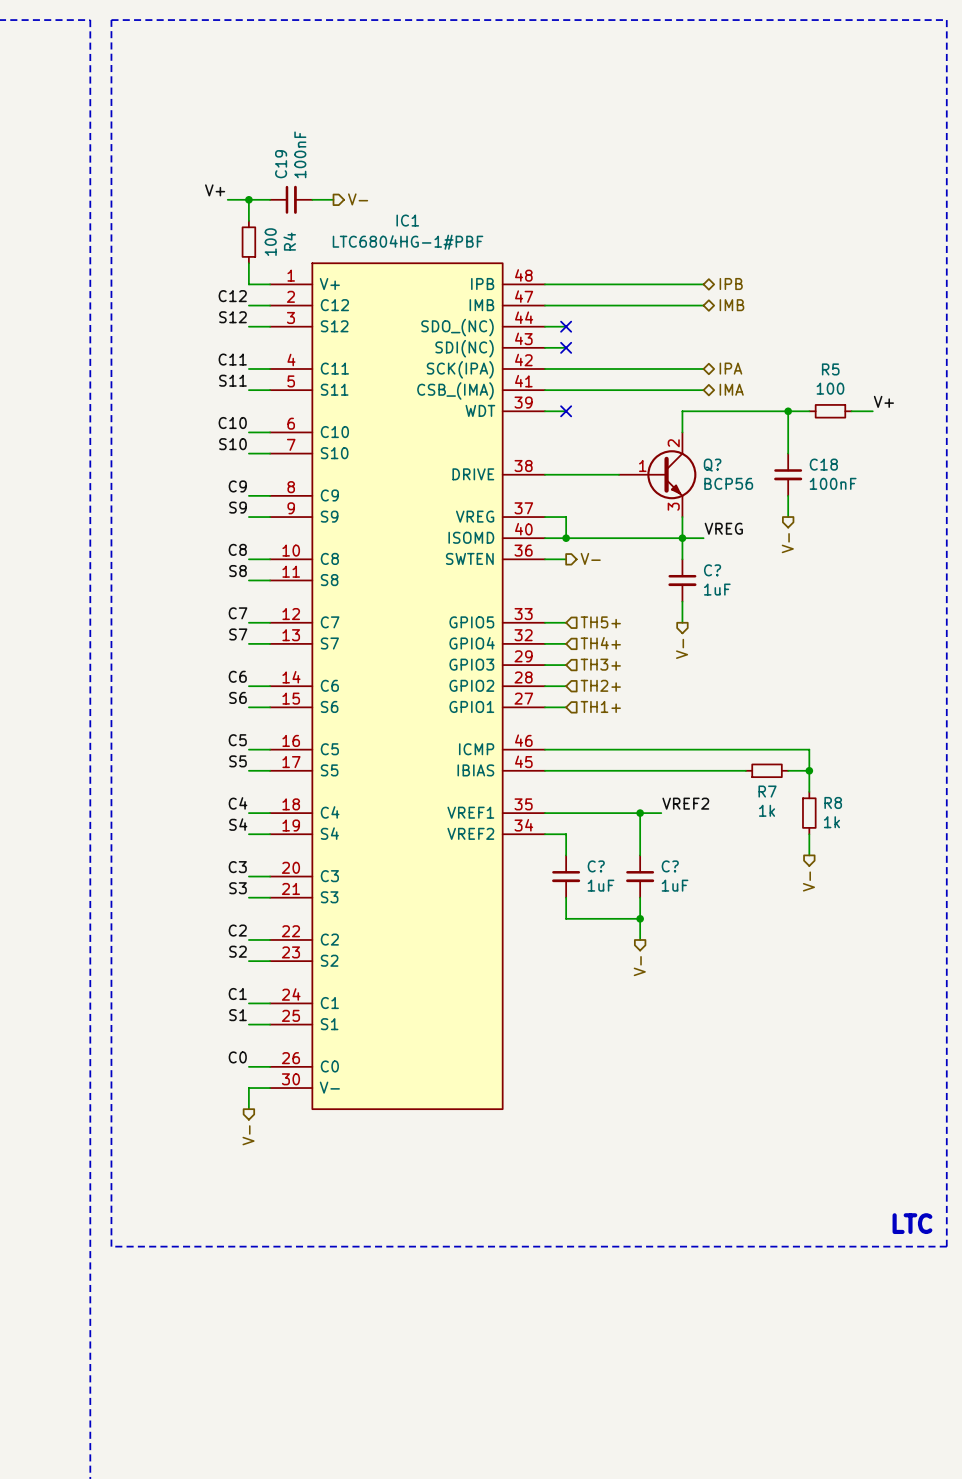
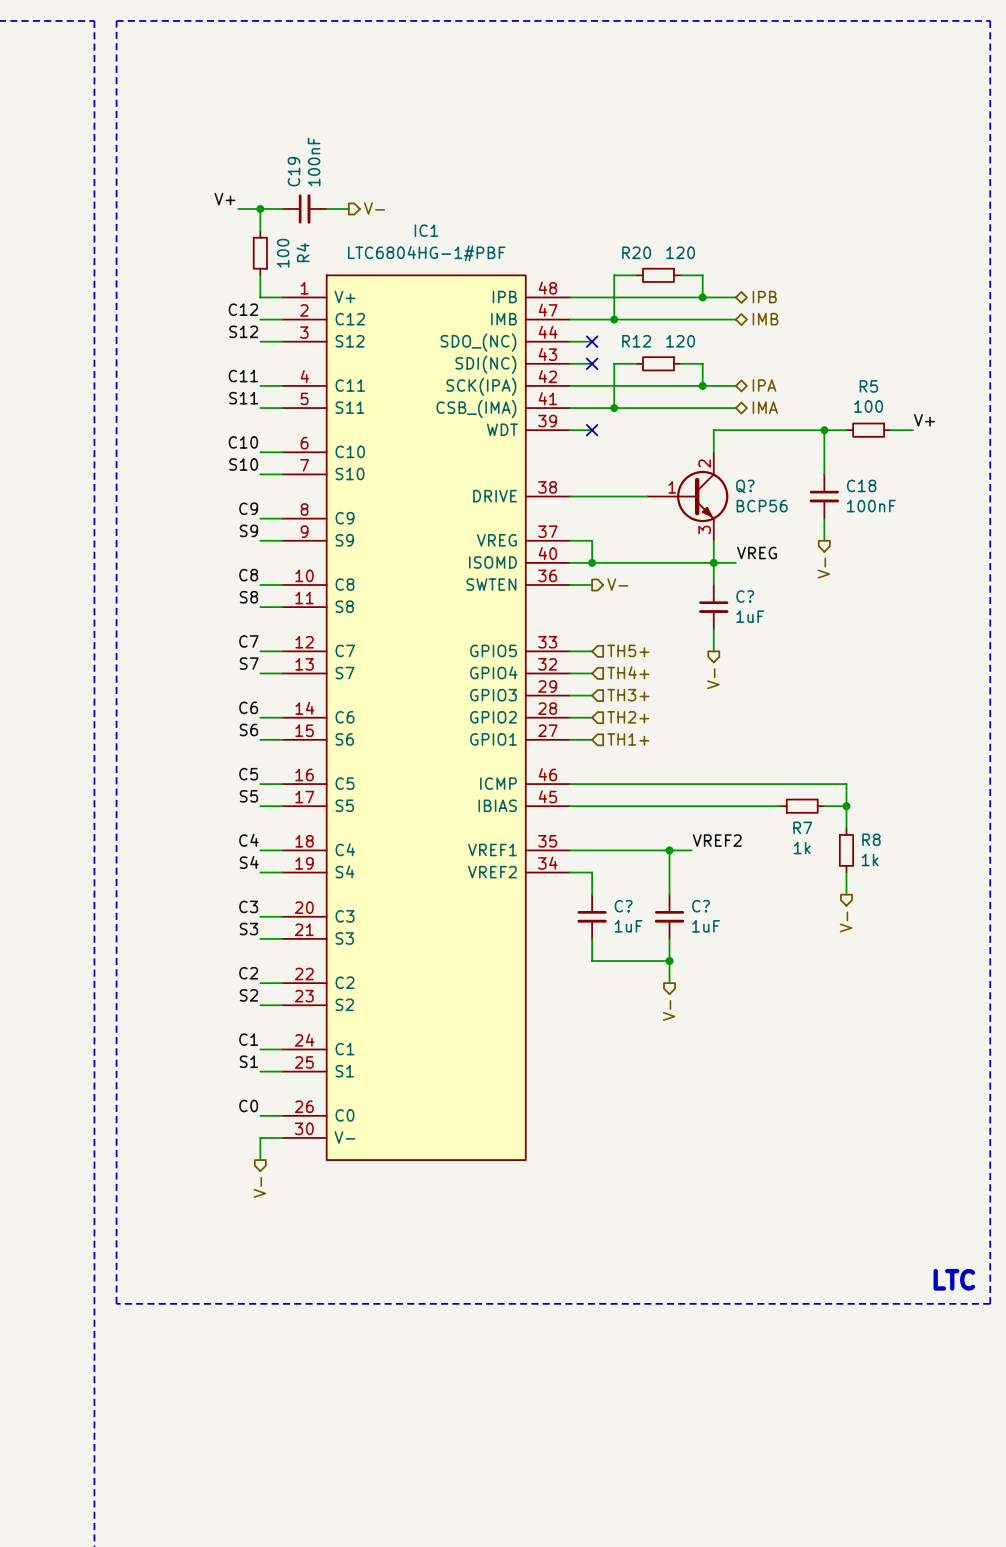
wire: none -> (636, 275) (614, 275) (614, 319)
R20: none -> 120 (658, 275)
wire: none -> (680, 275) (702, 275) (702, 297)
junction: none -> (702, 297)
junction: none -> (614, 319)
wire: none -> (636, 363) (614, 363) (614, 408)
R12: none -> 120 (658, 363)
wire: none -> (680, 363) (702, 363) (702, 385)
junction: none -> (702, 385)
junction: none -> (614, 408)

